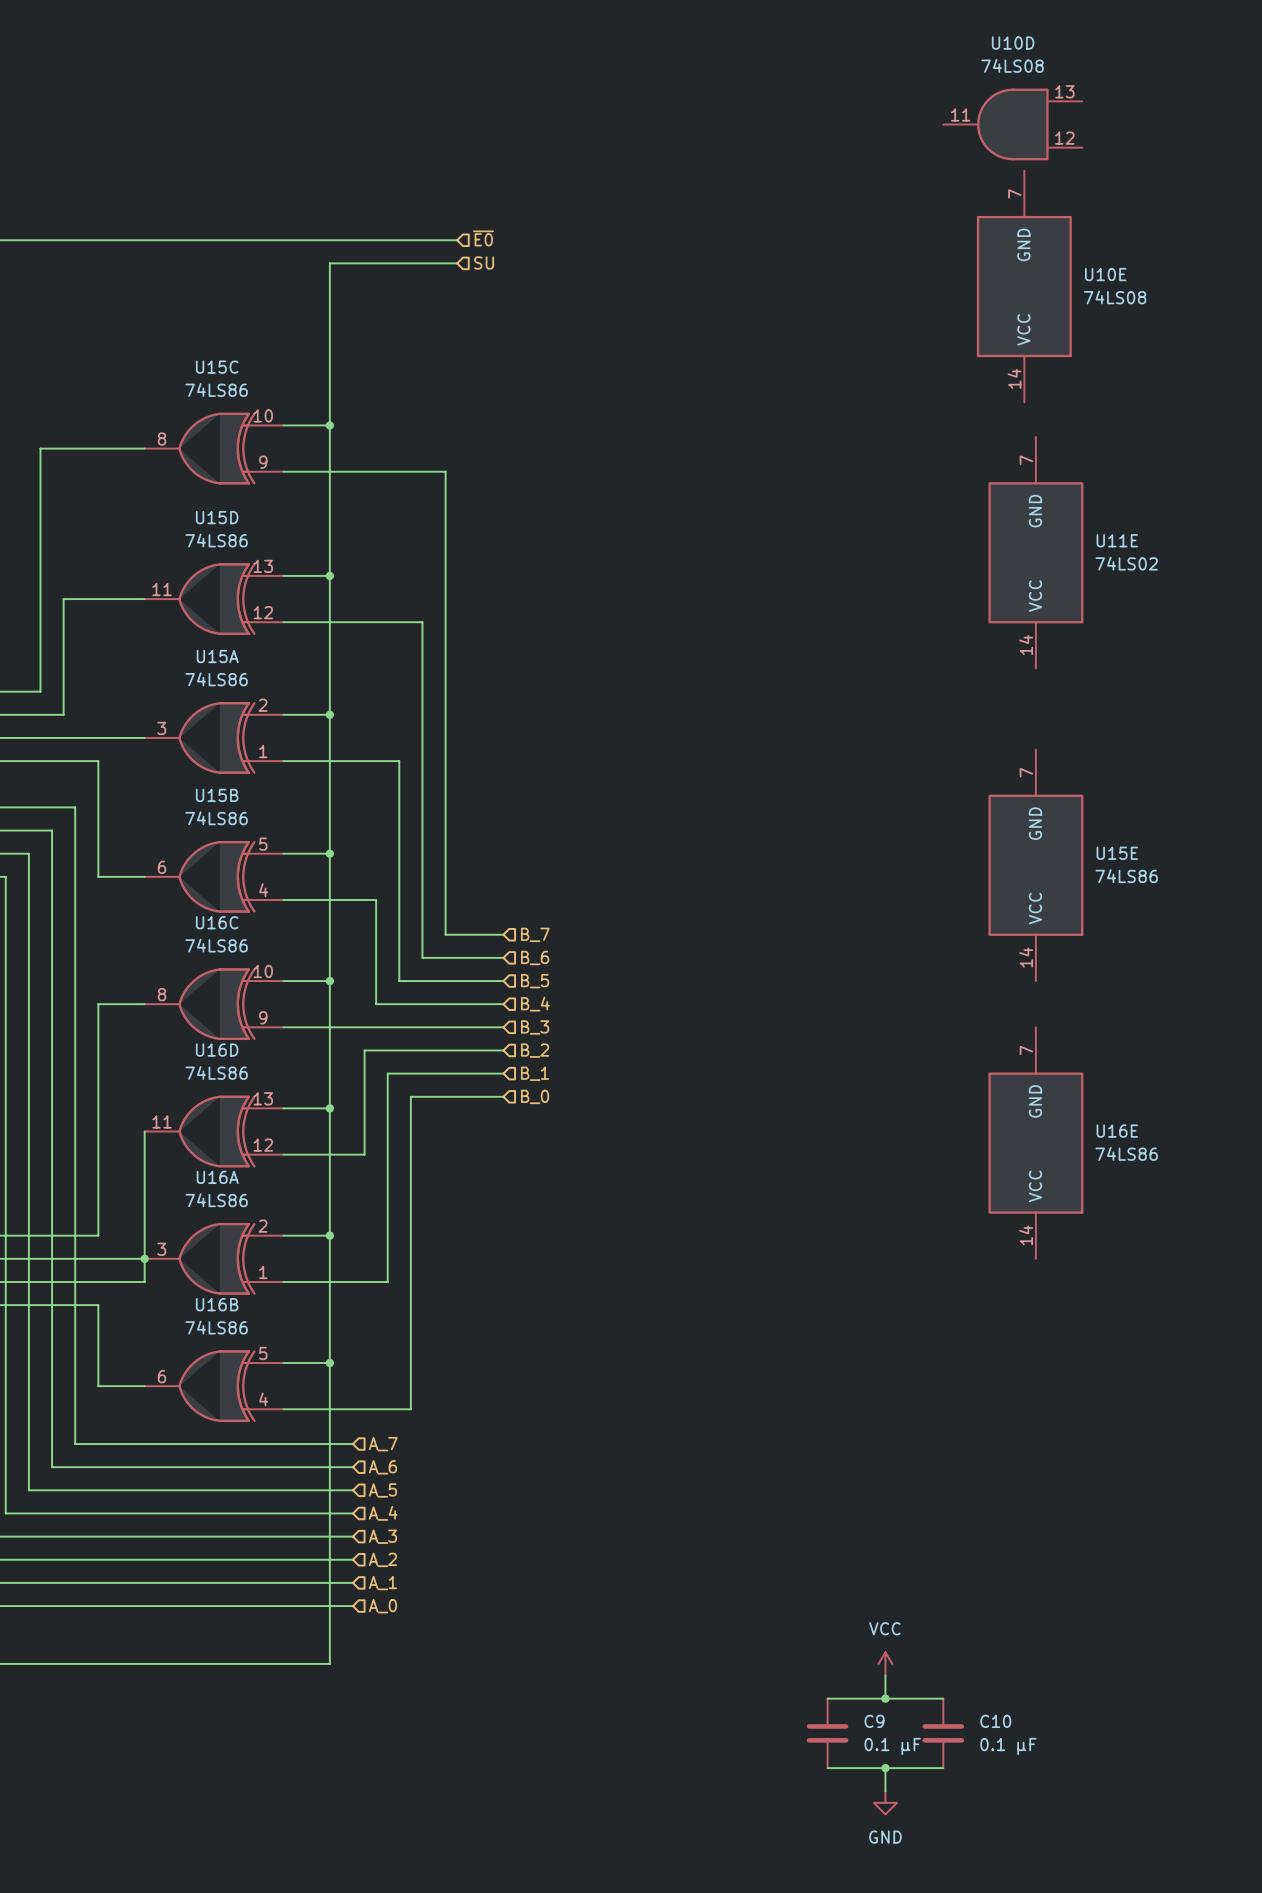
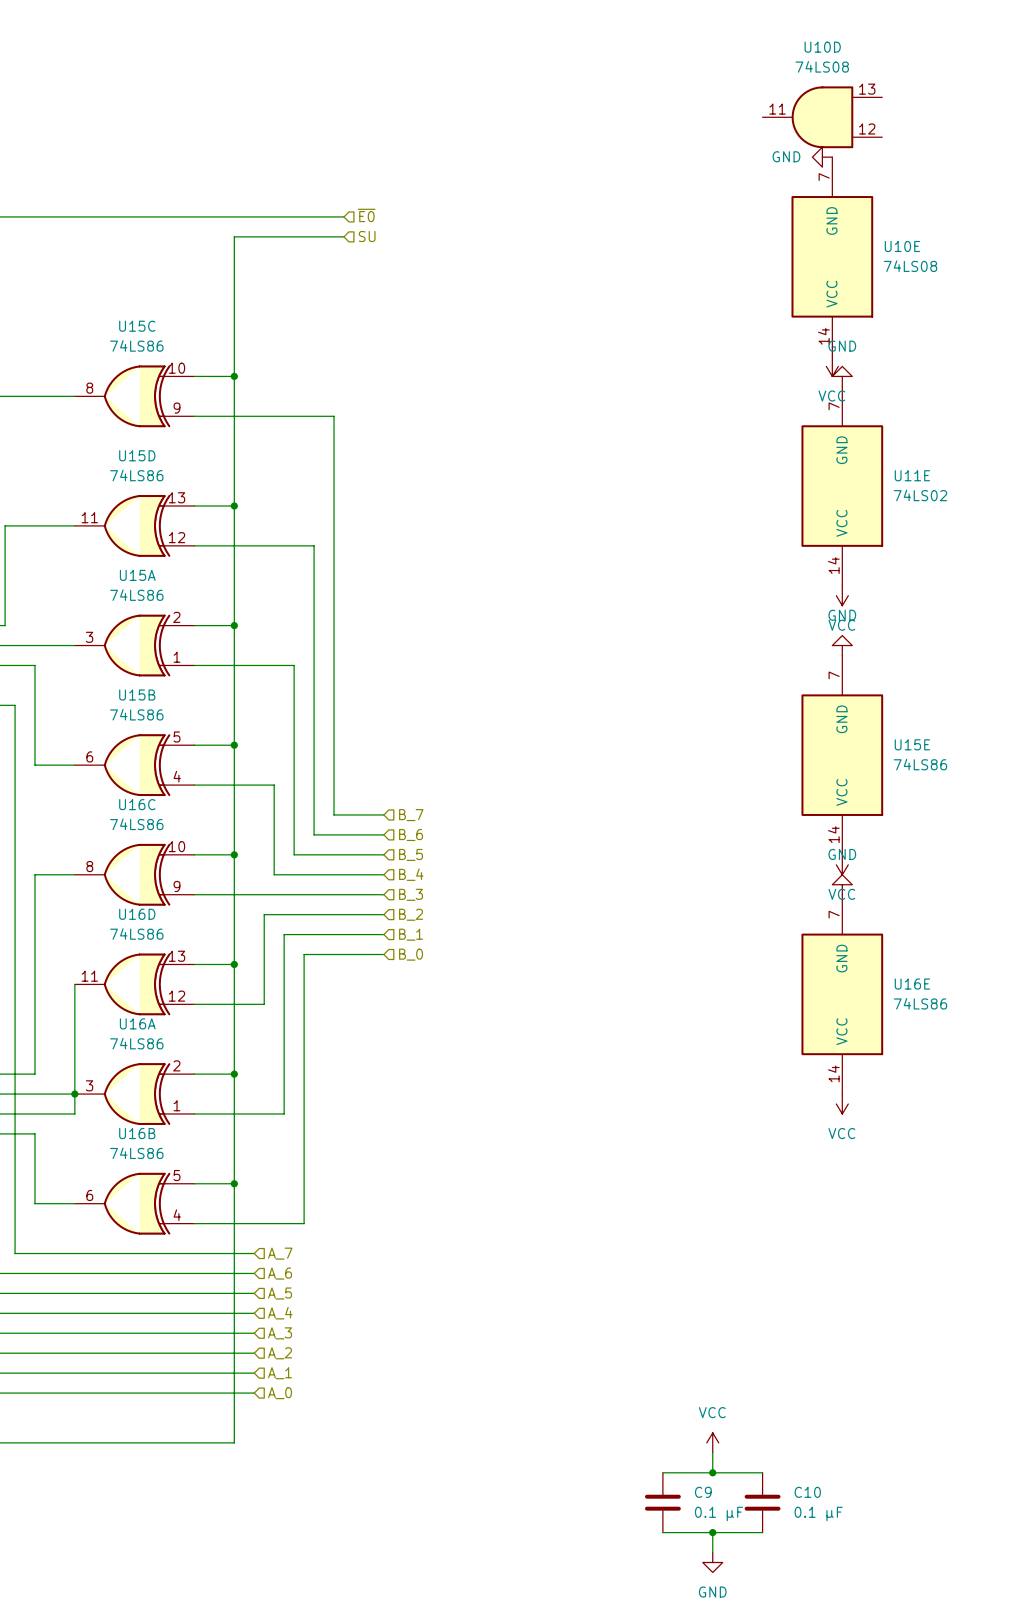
power symbol: none -> GND (822, 157)
power symbol: none -> VCC (832, 366)
power symbol: none -> GND (842, 376)
power symbol: none -> VCC (842, 595)
power symbol: none -> GND (842, 645)
power symbol: none -> VCC (842, 864)
power symbol: none -> GND (842, 884)
power symbol: none -> VCC (842, 1104)

